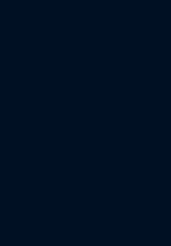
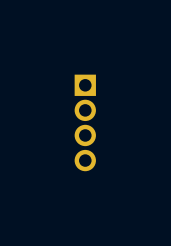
part: none -> (85, 122)

